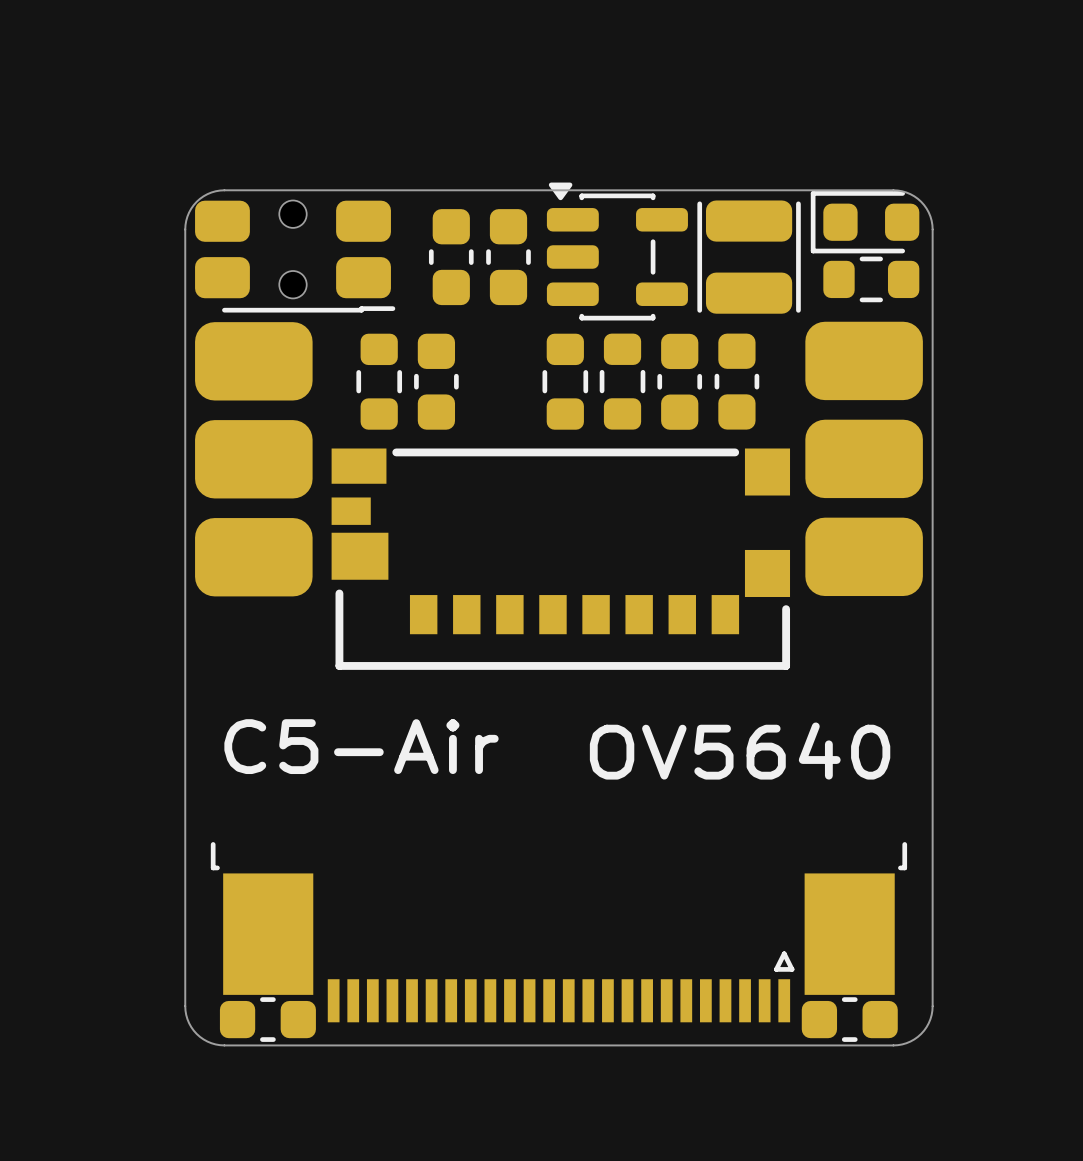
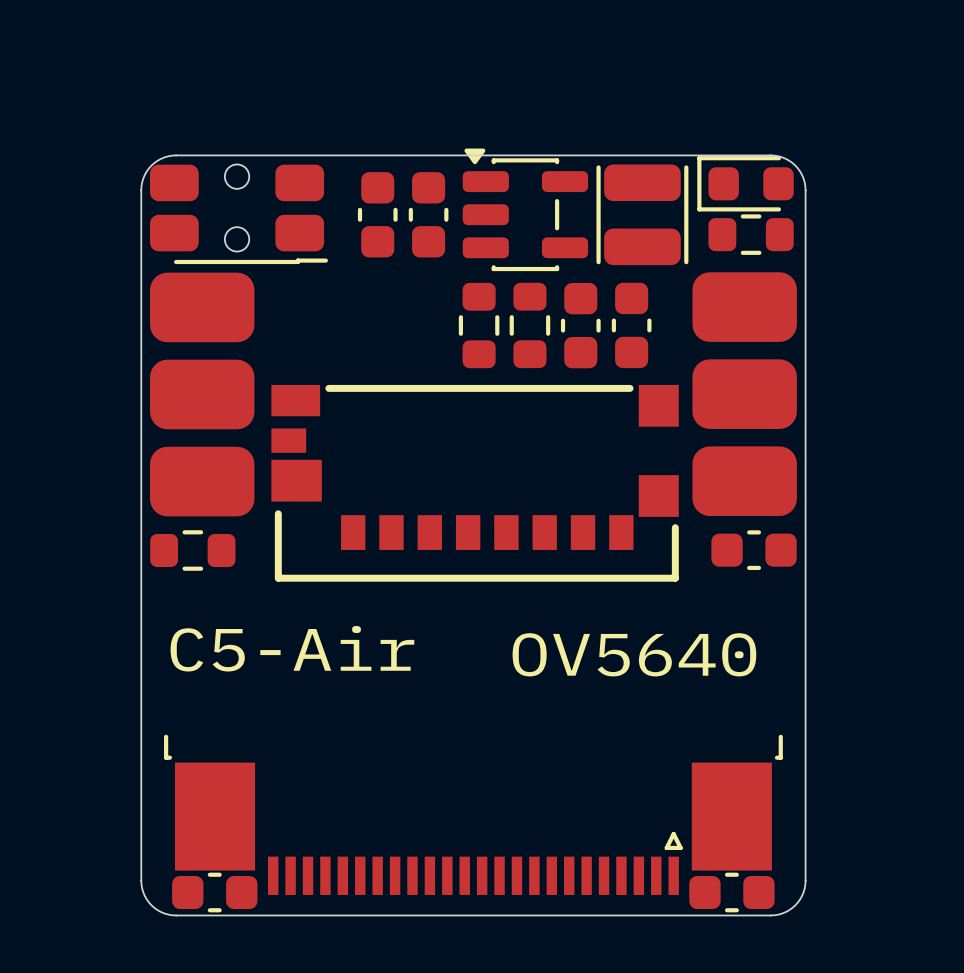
part rotation: 0° (379, 381) -> 90° clockwise (192, 550)
part position: (379, 381) -> (192, 550)
part rotation: 0° (436, 381) -> 90° clockwise (754, 550)
part position: (436, 381) -> (754, 550)

